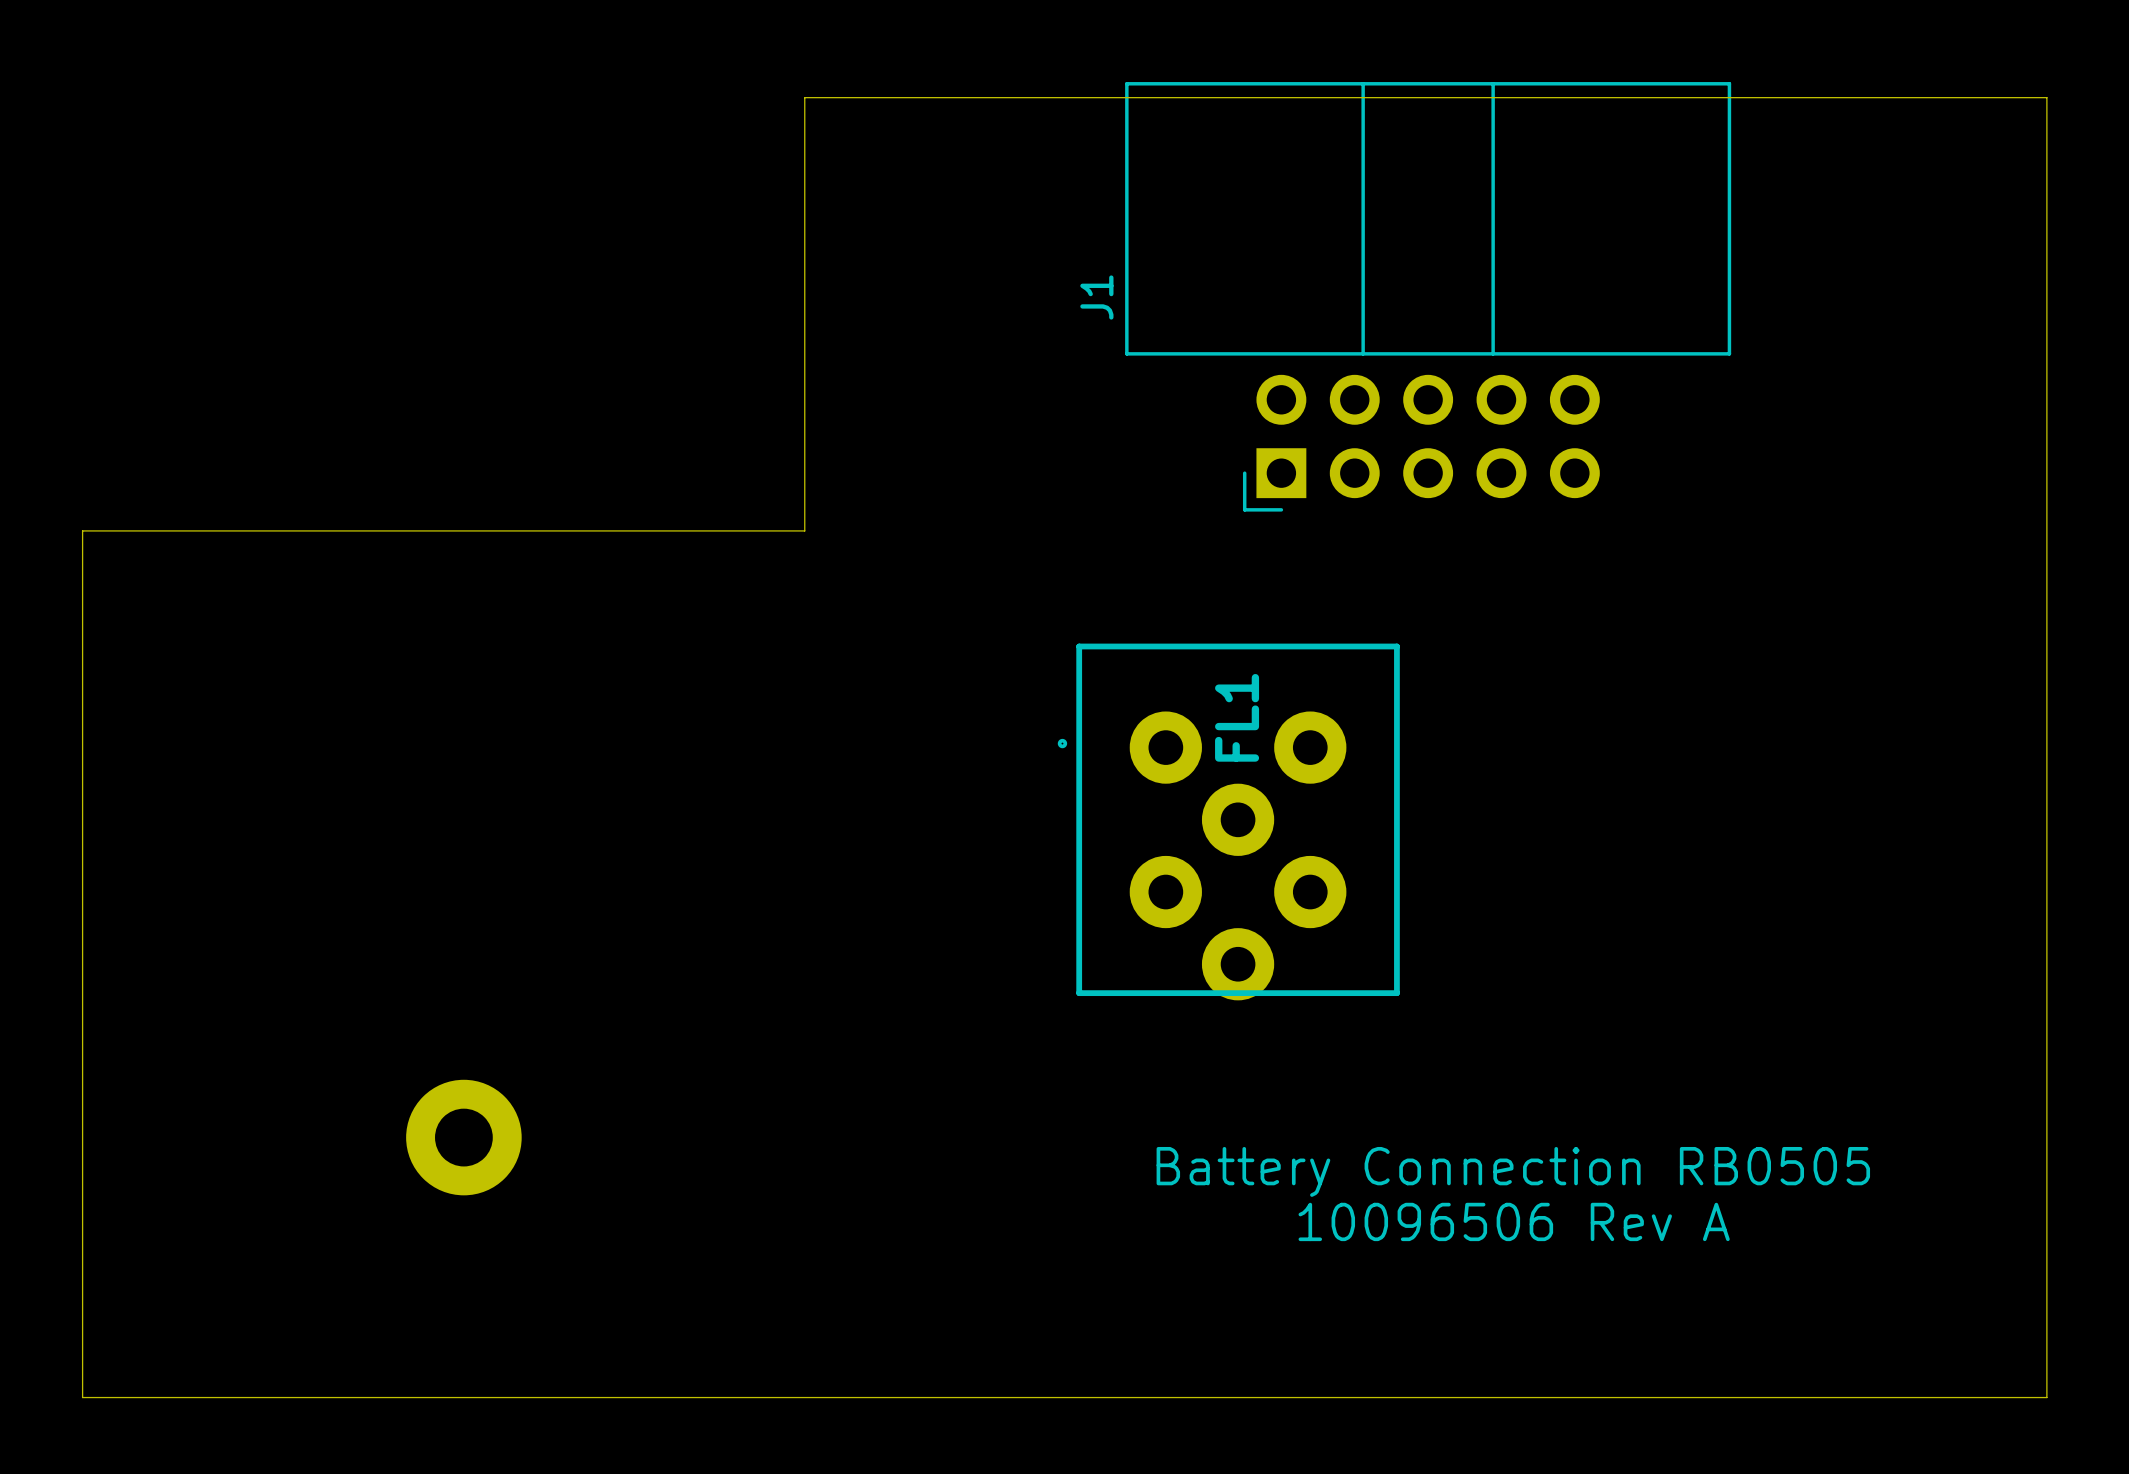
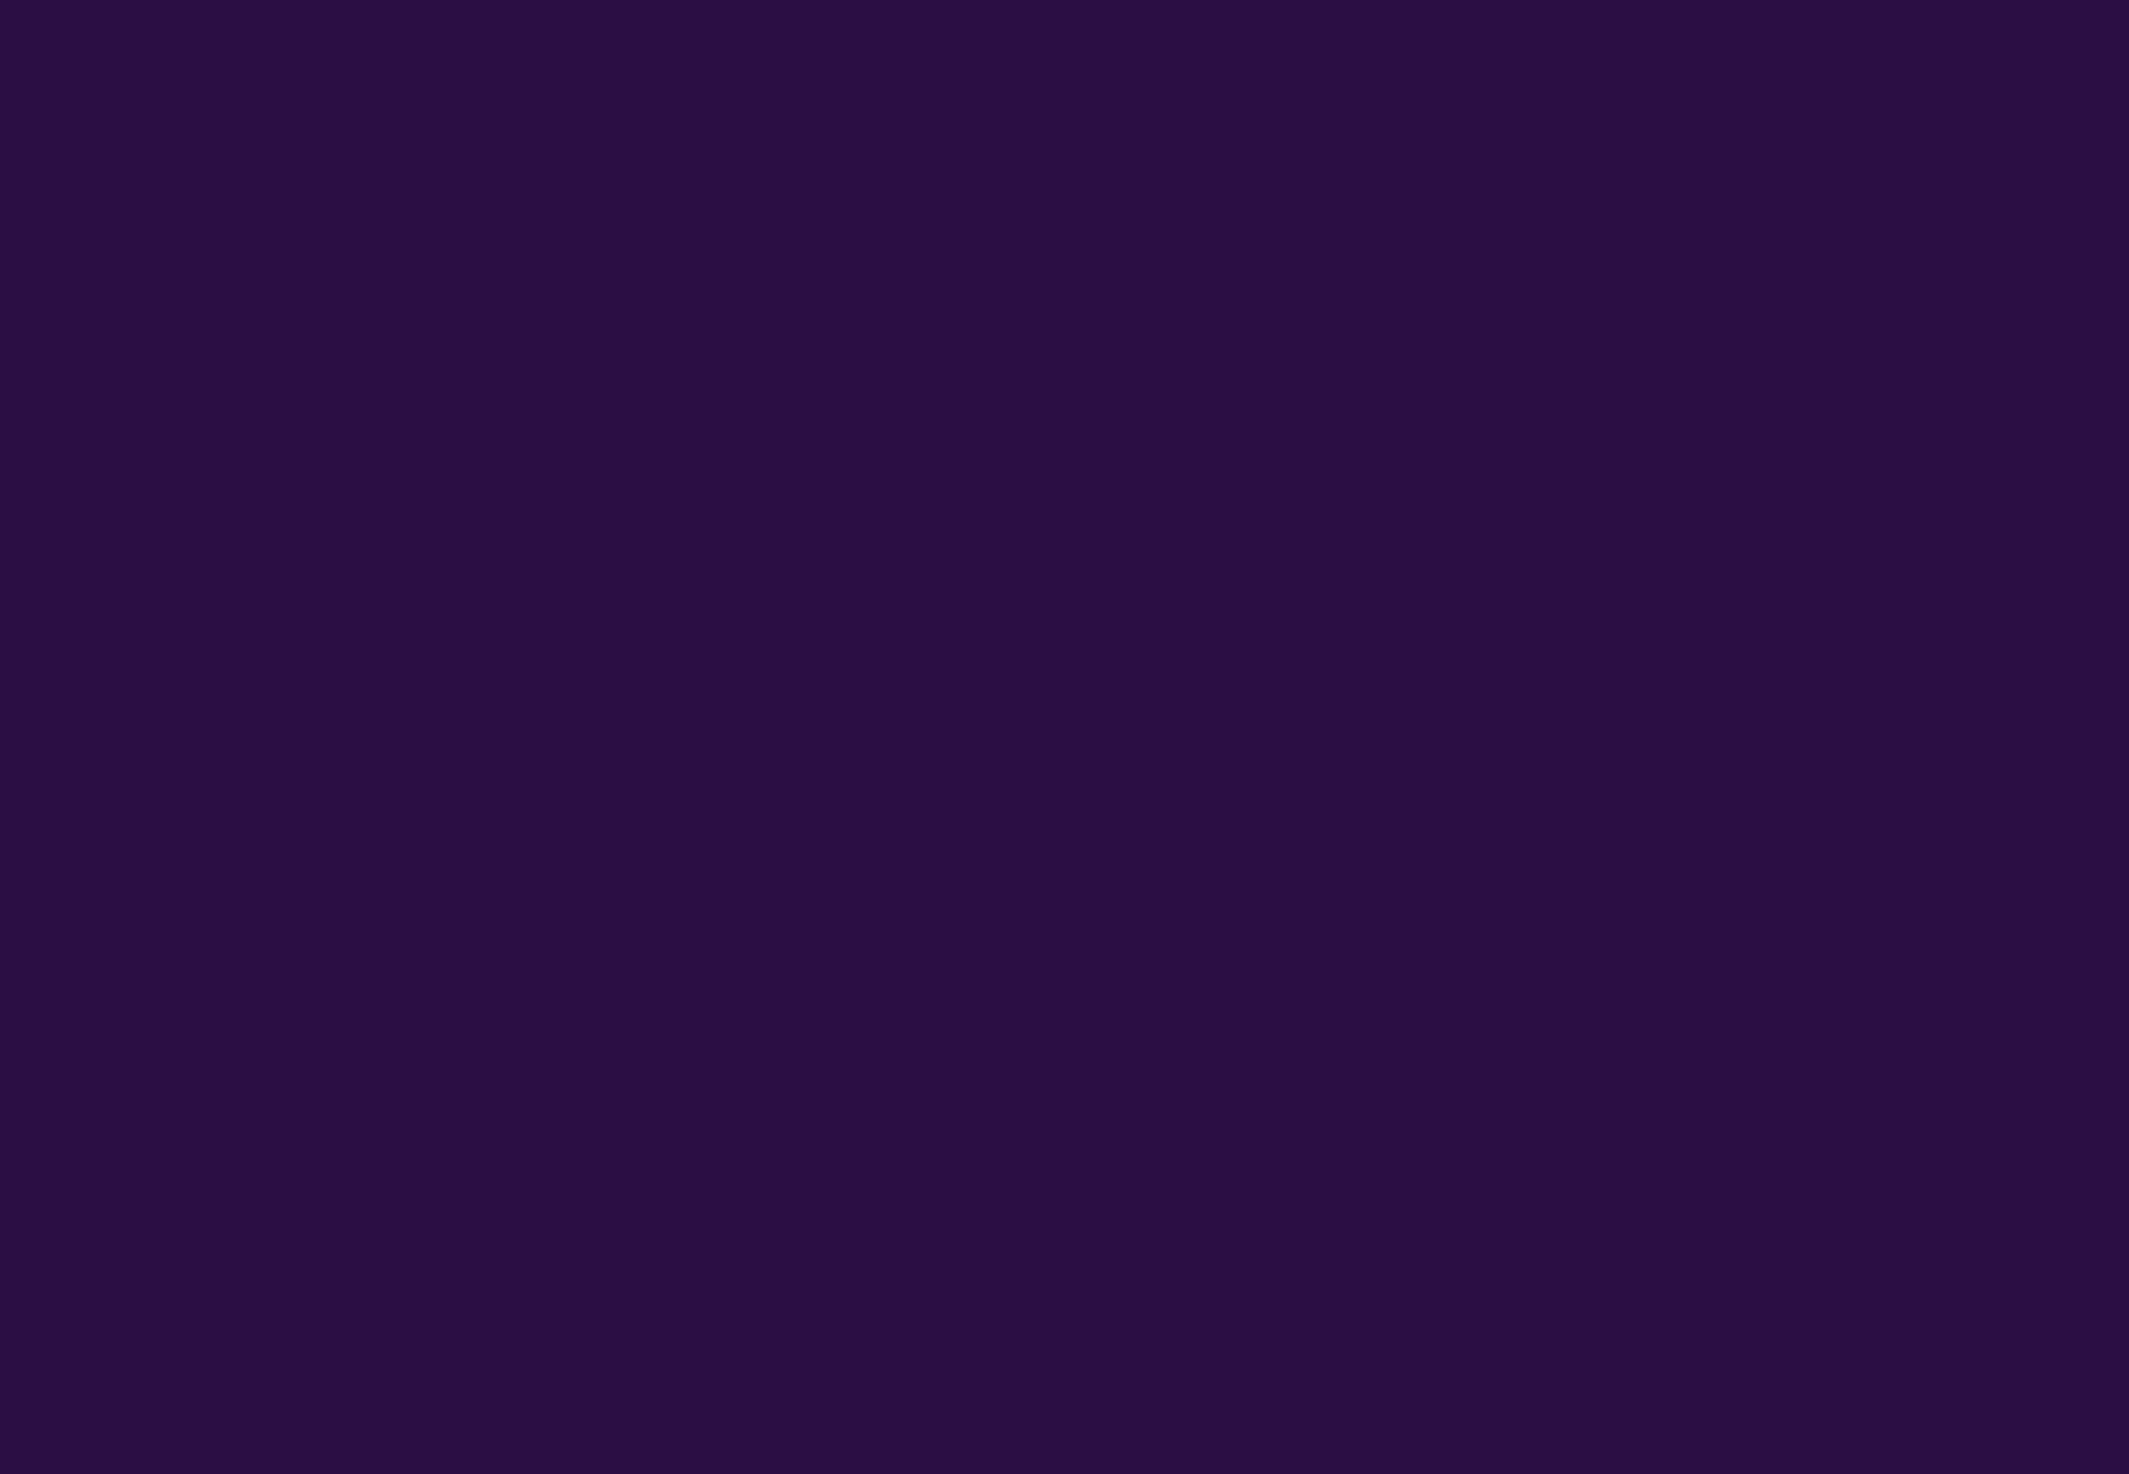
board edge: (804, 97) (2046, 97) (2046, 1397) (82, 1397) (82, 530) (804, 530) (804, 97) -> none
J1: (1428, 296) -> none
FL1: (1228, 821) -> none
part: (463, 1137) -> none
text: Battery Connection RB0505 (1513, 1171) -> none
text: 10096506 Rev A (1514, 1221) -> none

